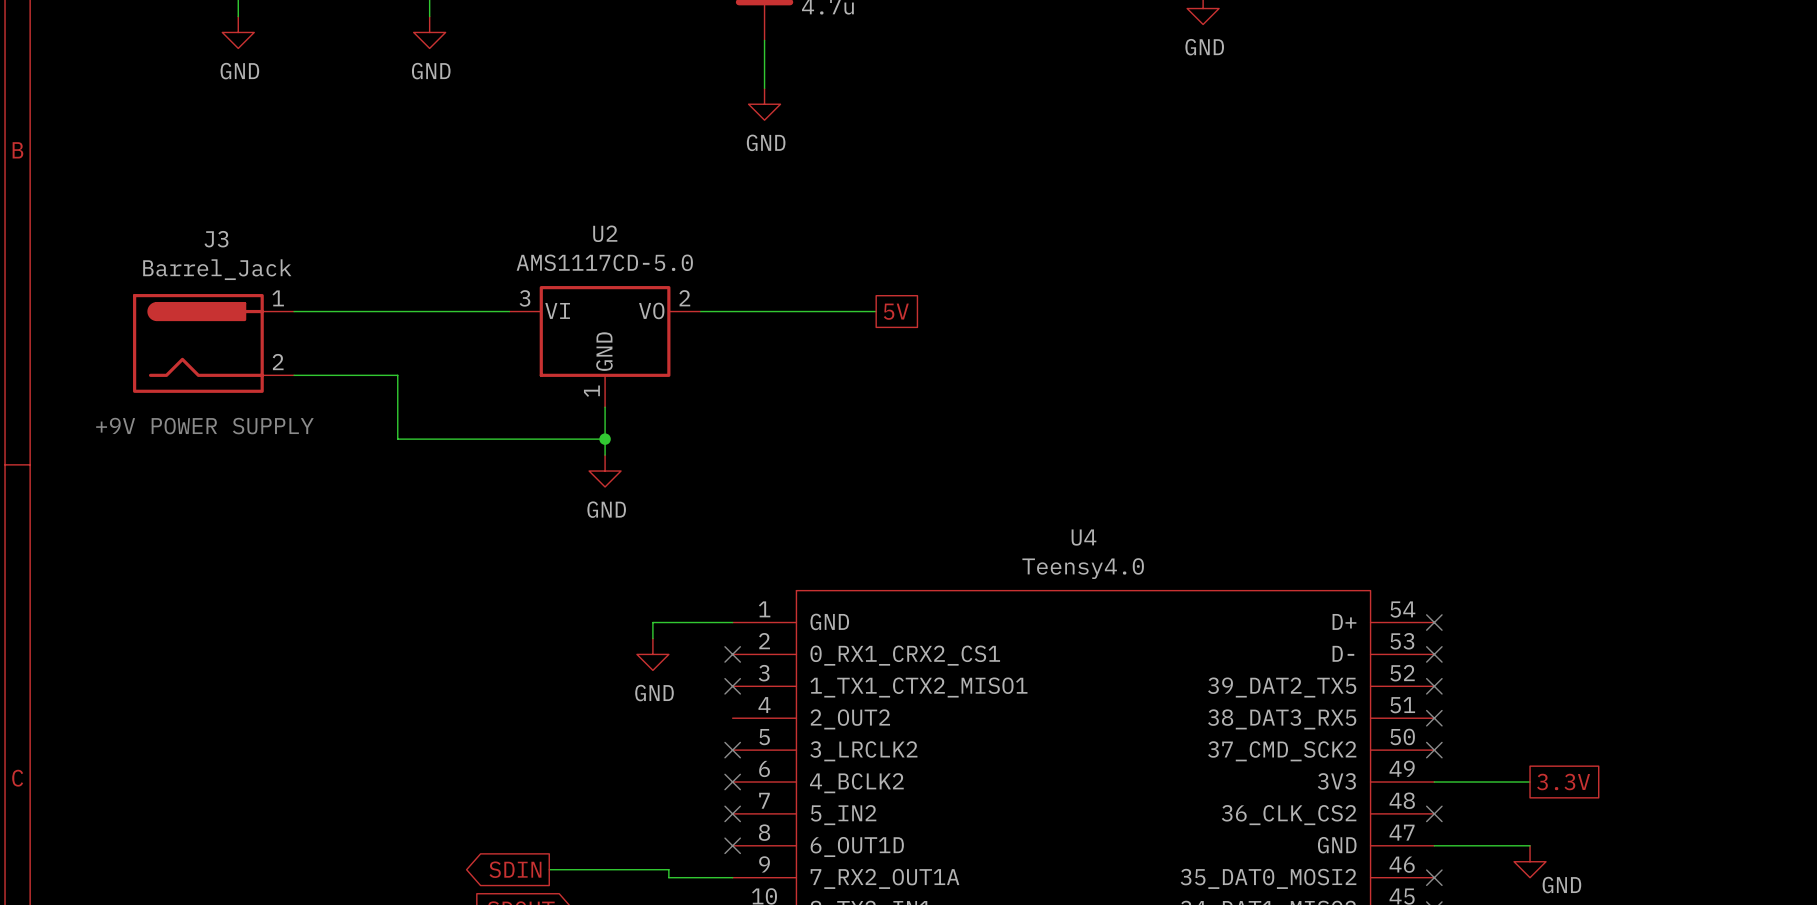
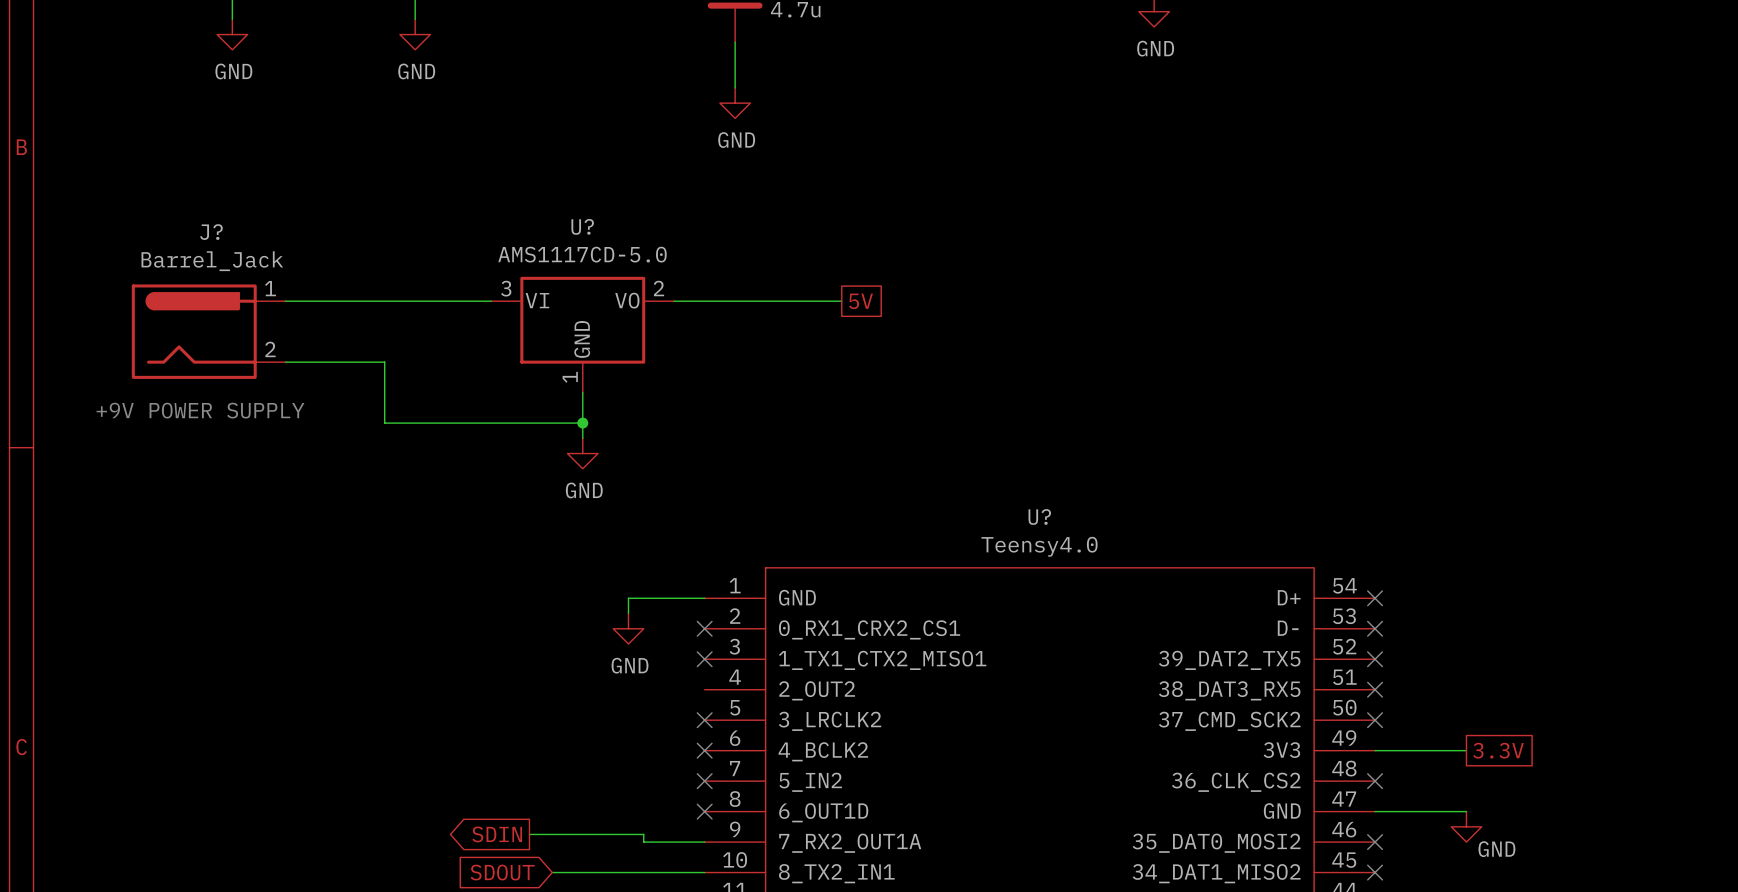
U2 name: U2 (605, 233) -> U? (582, 226)
J3 name: J3 (216, 239) -> J? (211, 232)
U4 name: U4 (1083, 537) -> U? (1039, 516)

